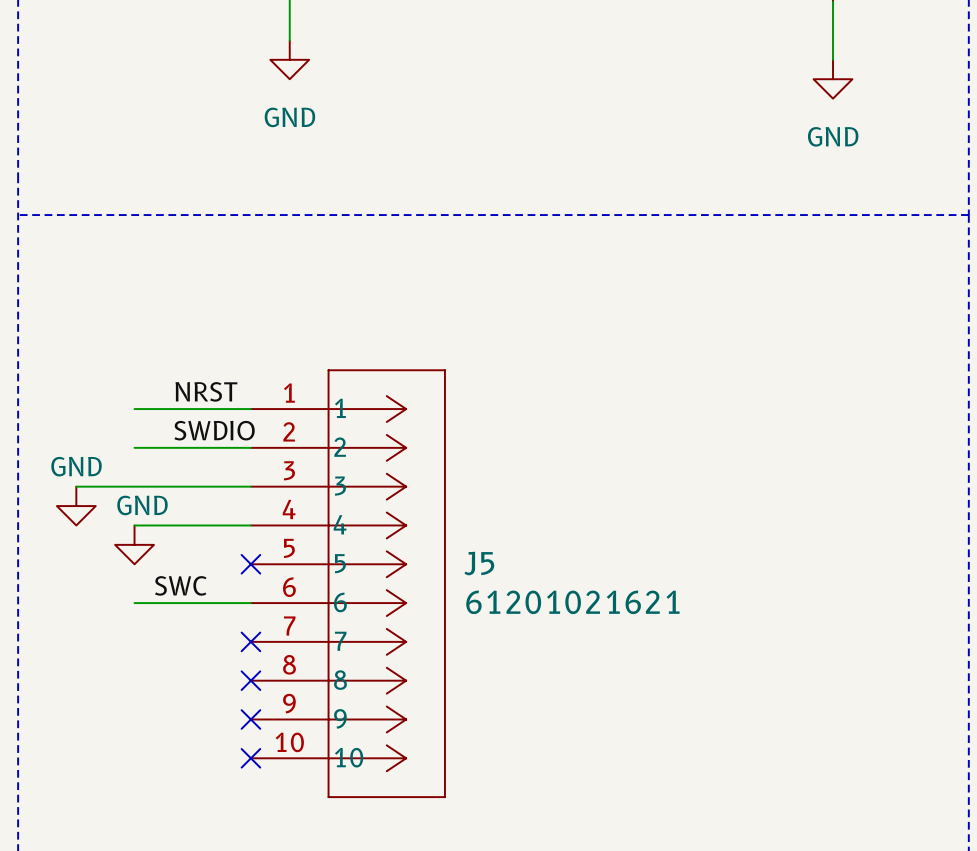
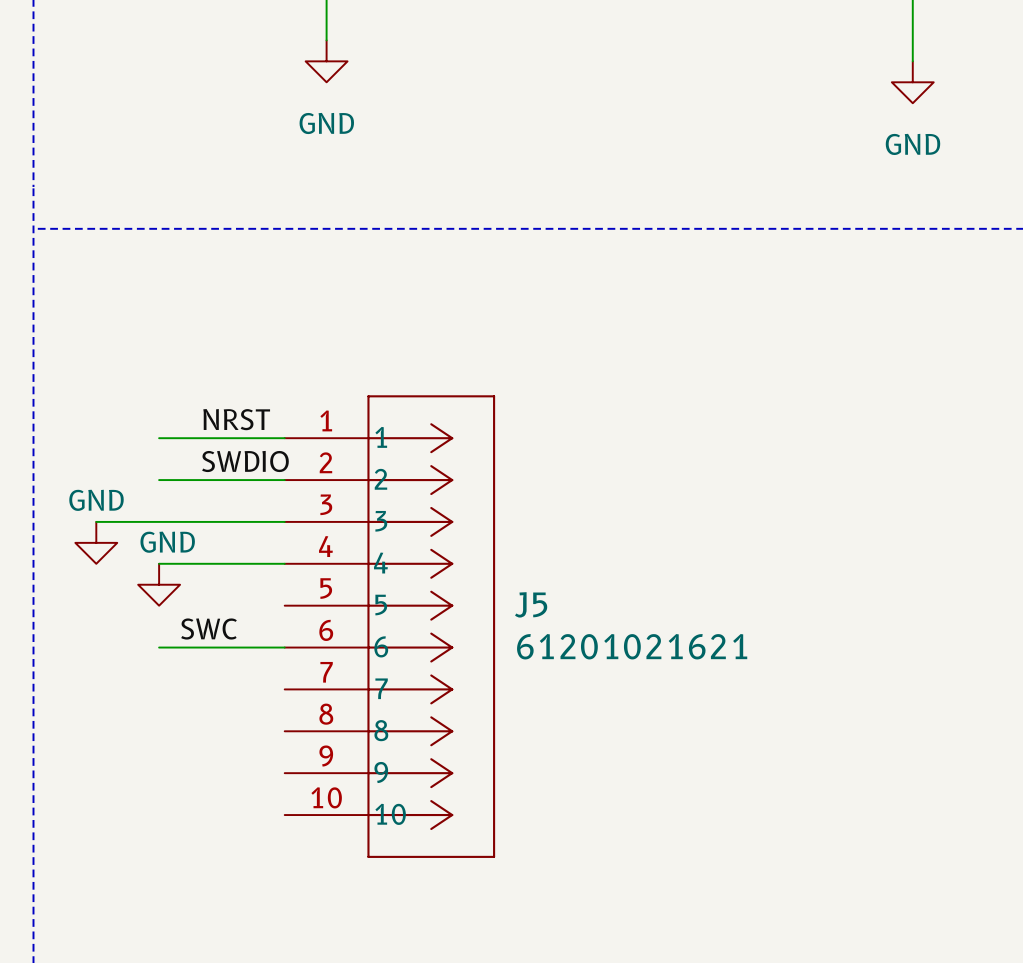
no-connect mark: (250, 564) -> none
no-connect mark: (250, 641) -> none
no-connect mark: (250, 680) -> none
no-connect mark: (250, 719) -> none
no-connect mark: (250, 758) -> none

